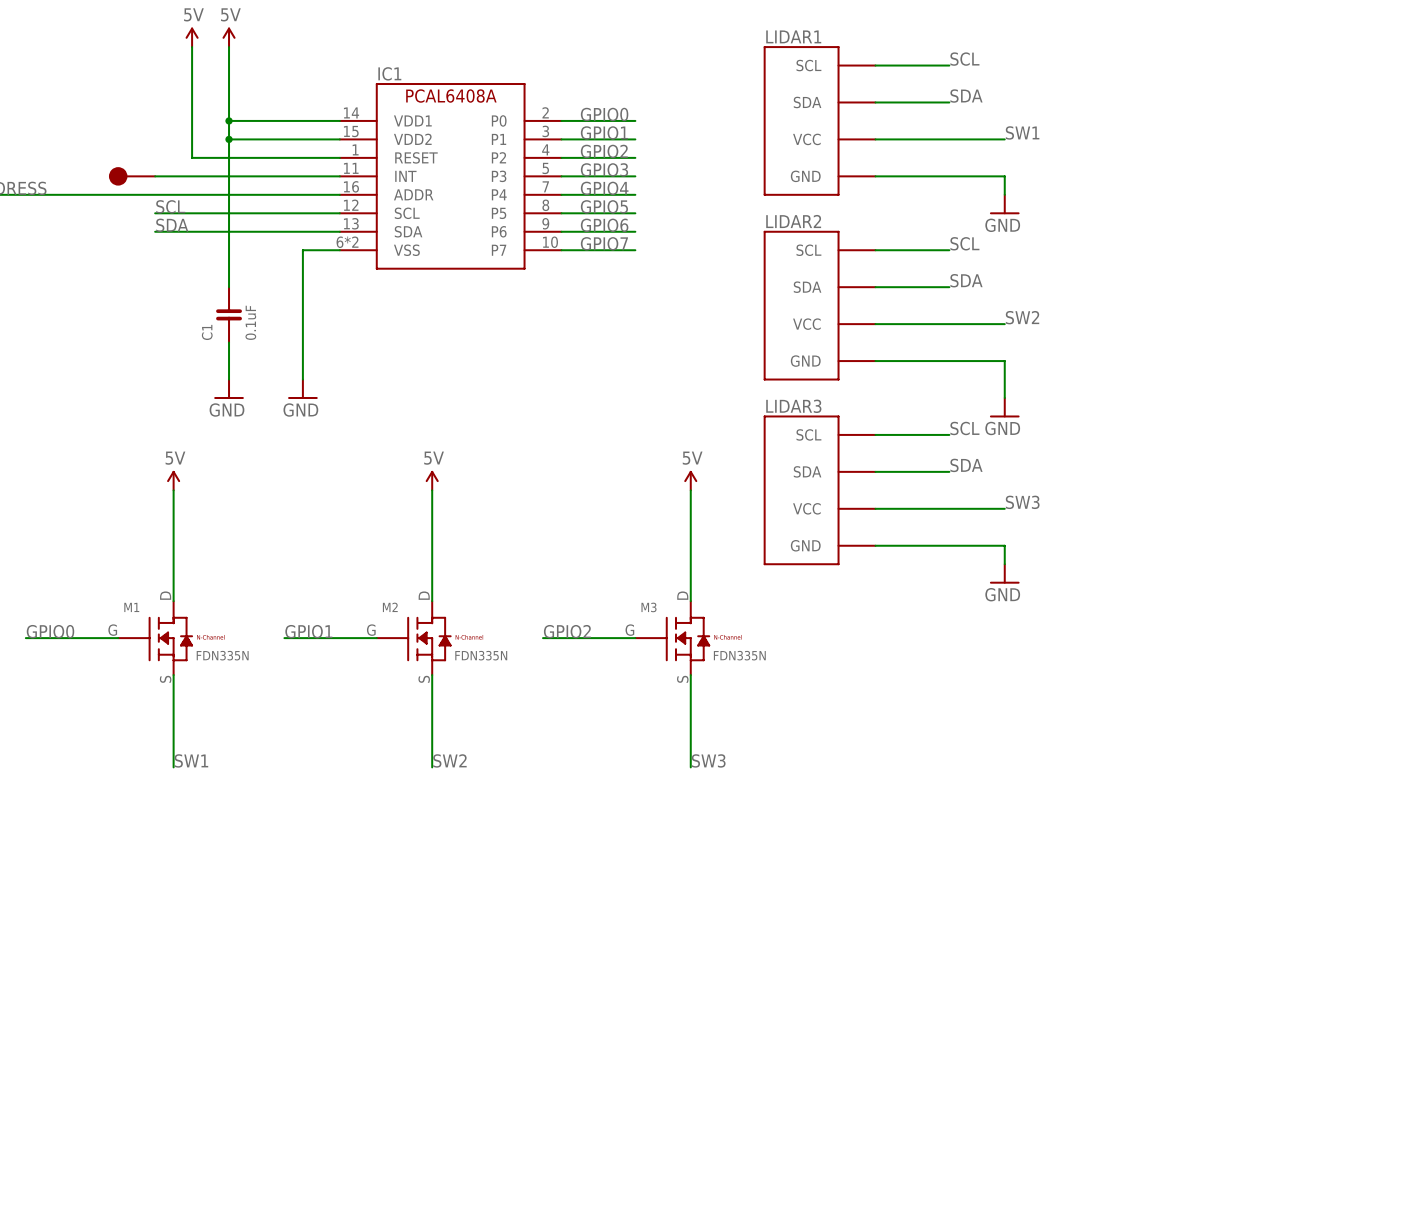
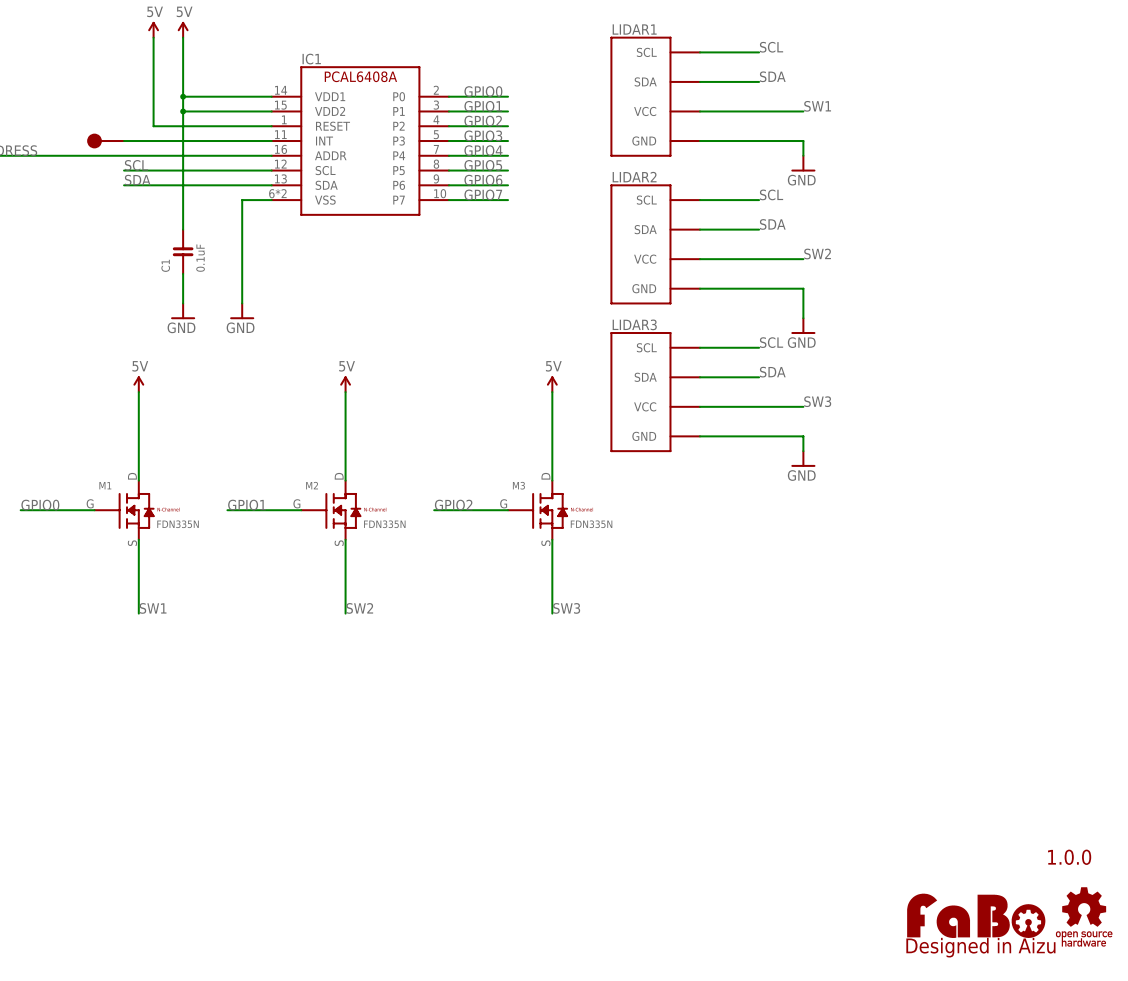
text: none -> 1.0.0 (1069, 857)
part: none -> (976, 915)
part: none -> (1084, 916)

